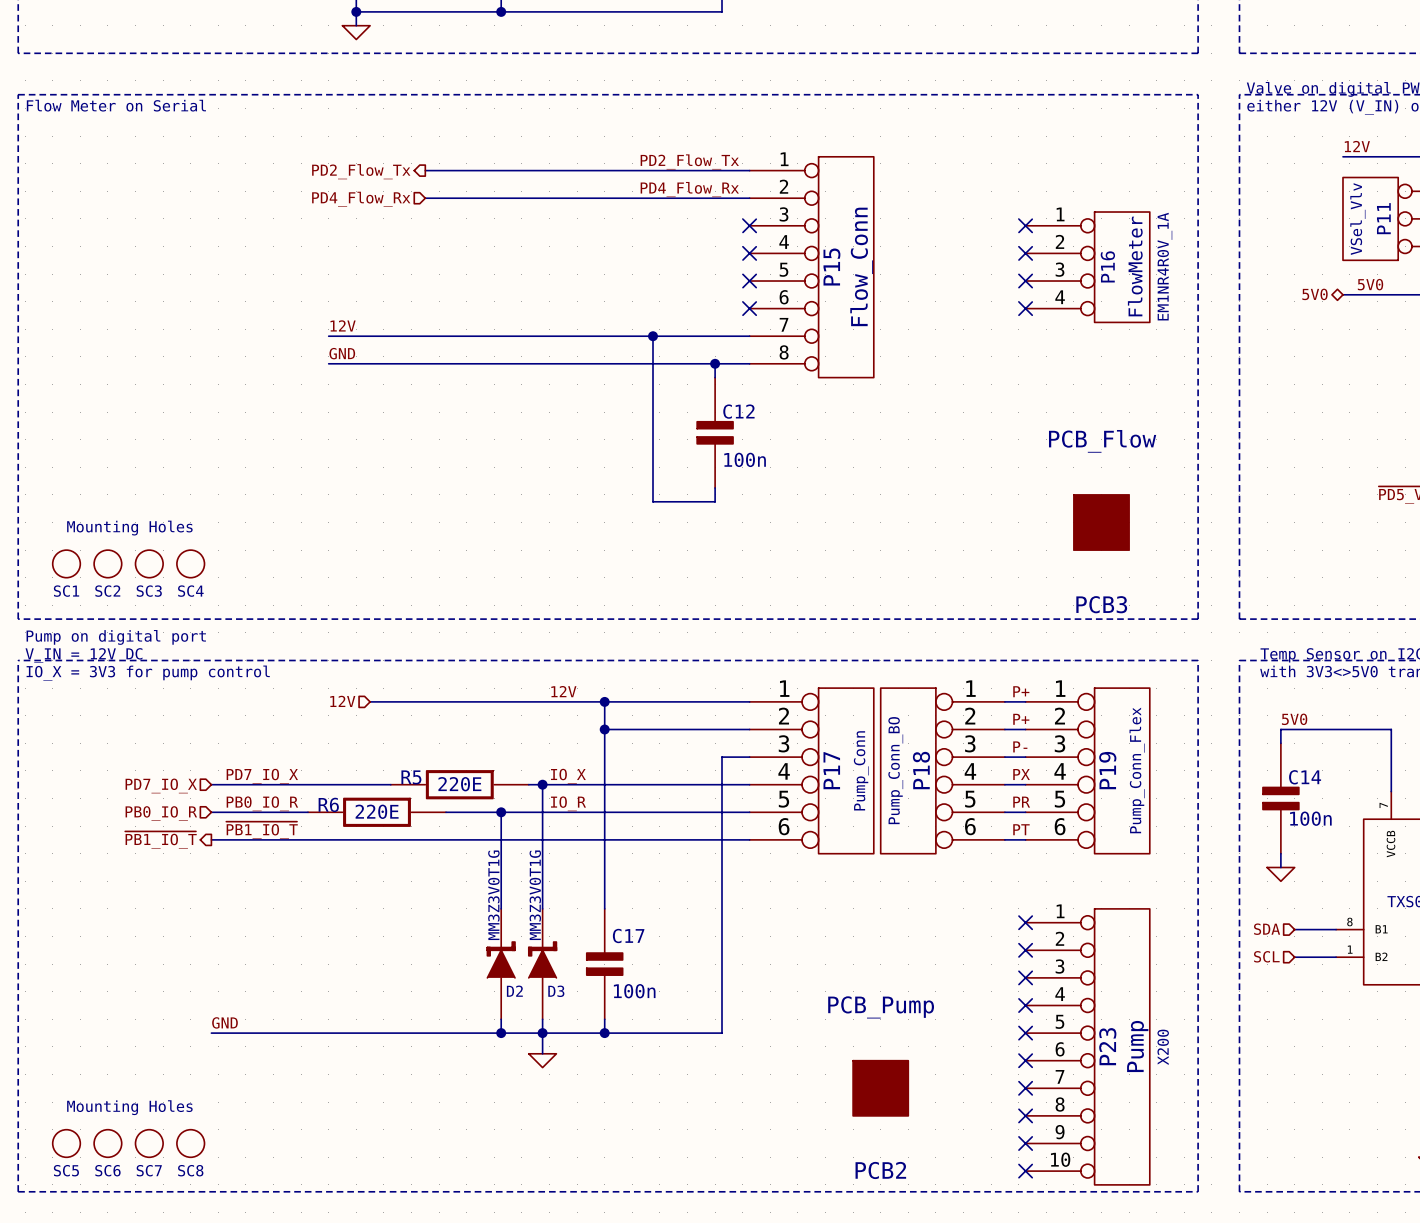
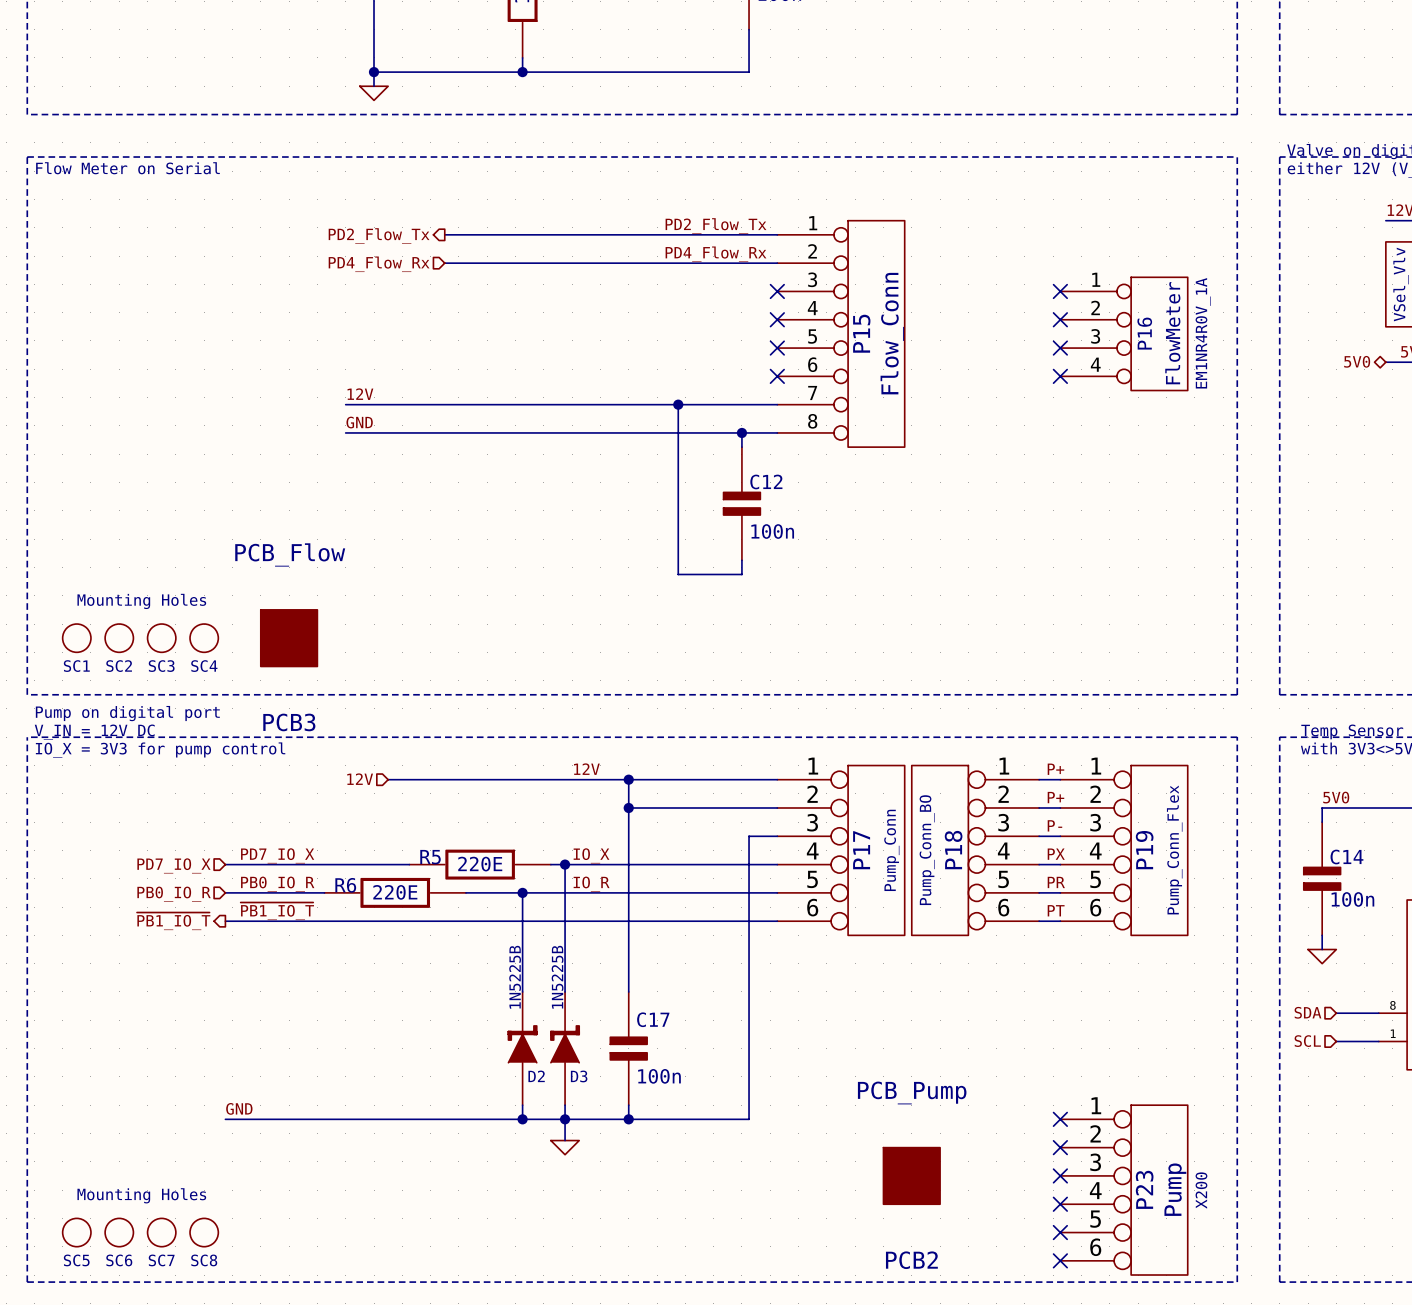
PCB3 position: (1101, 522) -> (289, 638)
D2 value: MM3Z3V0T1G (493, 895) -> 1N5225B (515, 977)
D3 value: MM3Z3V0T1G (535, 895) -> 1N5225B (557, 977)
P23 symbol: [1025, 908, 1150, 1185] -> [1060, 1105, 1188, 1276]
no-connect mark: (1025, 922) -> none
no-connect mark: (1025, 950) -> none
no-connect mark: (1025, 977) -> none
no-connect mark: (1025, 1005) -> none

